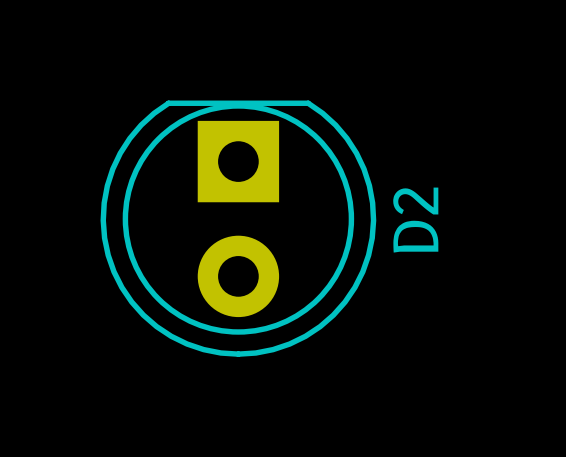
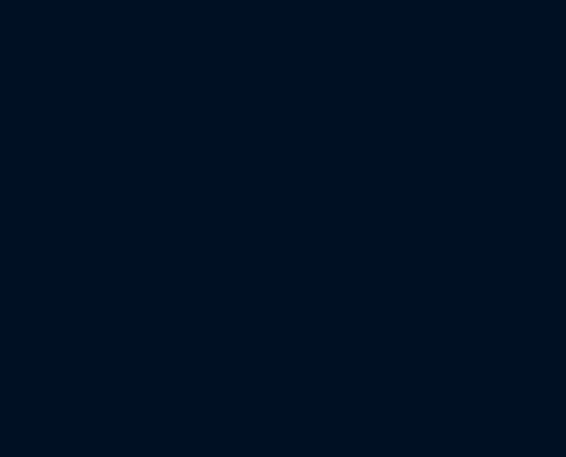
D2: (238, 228) -> none

